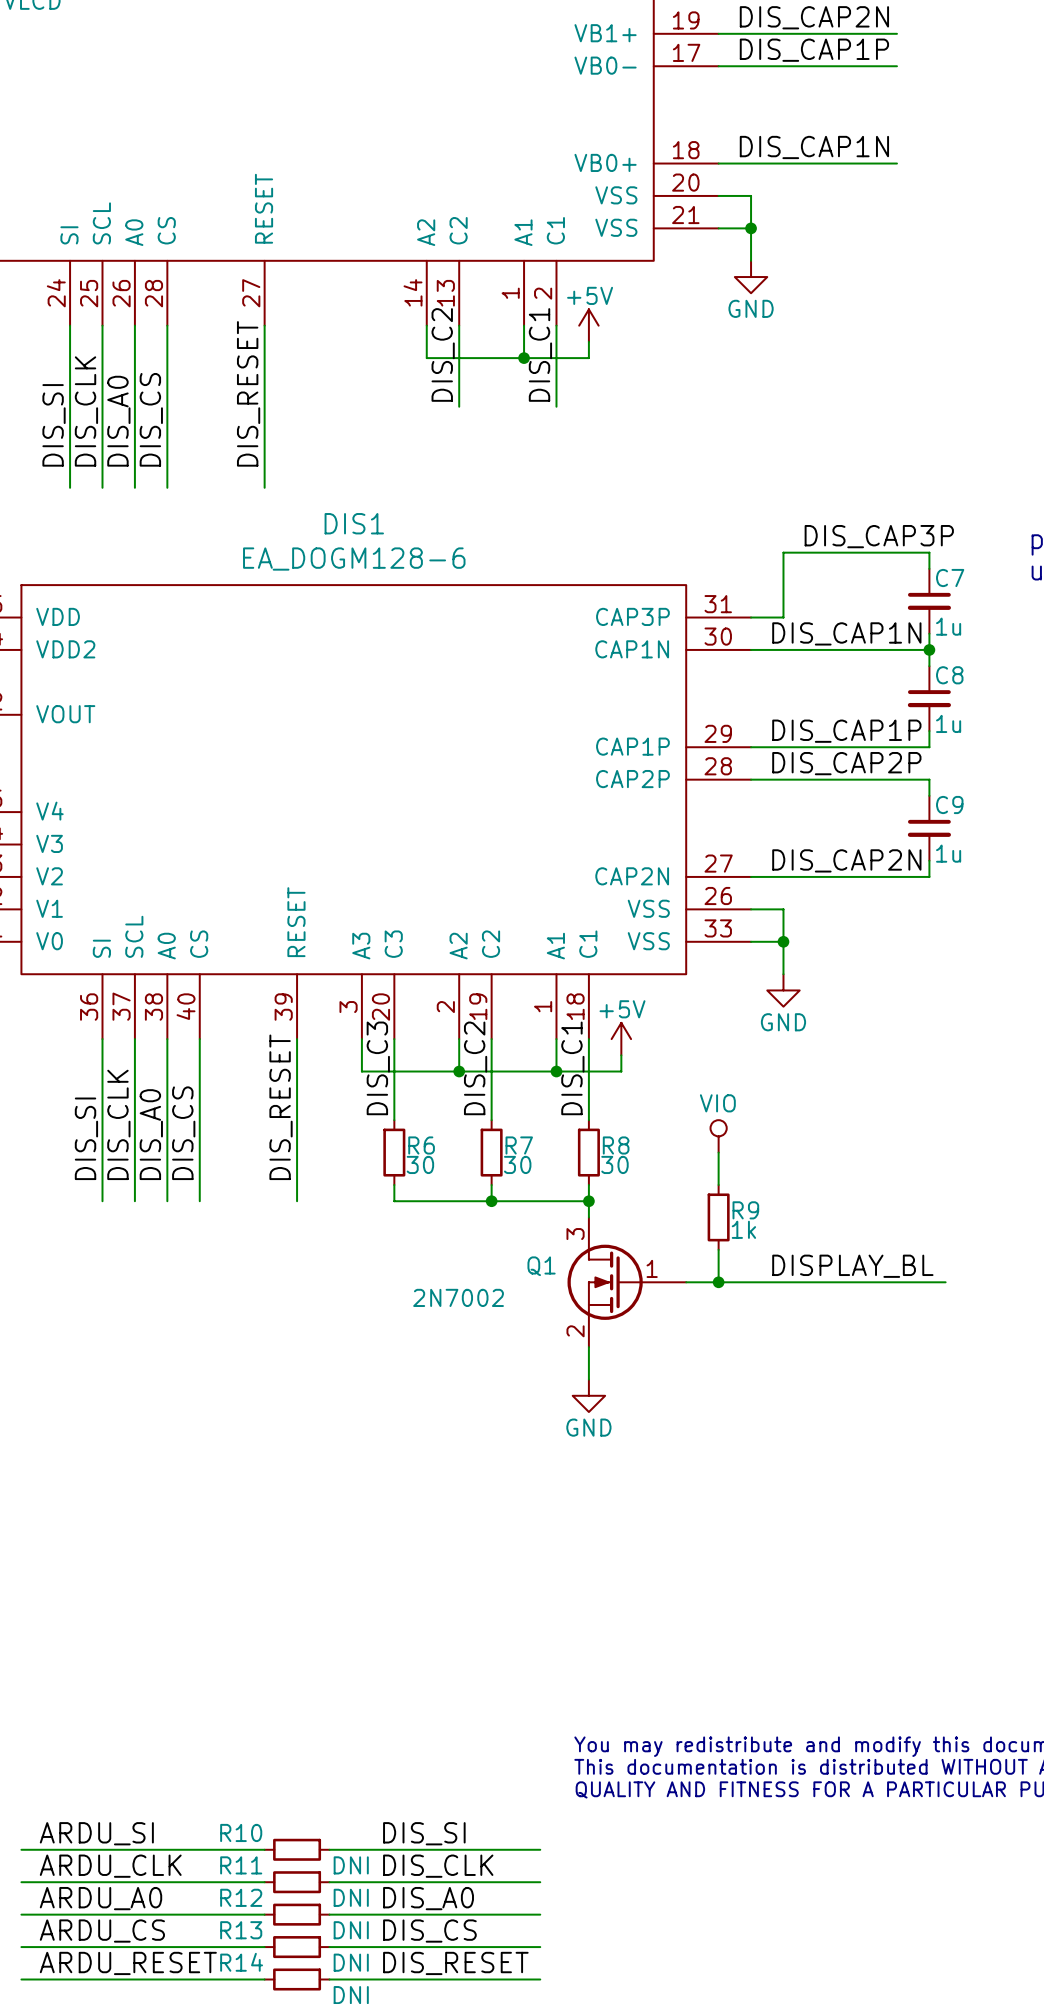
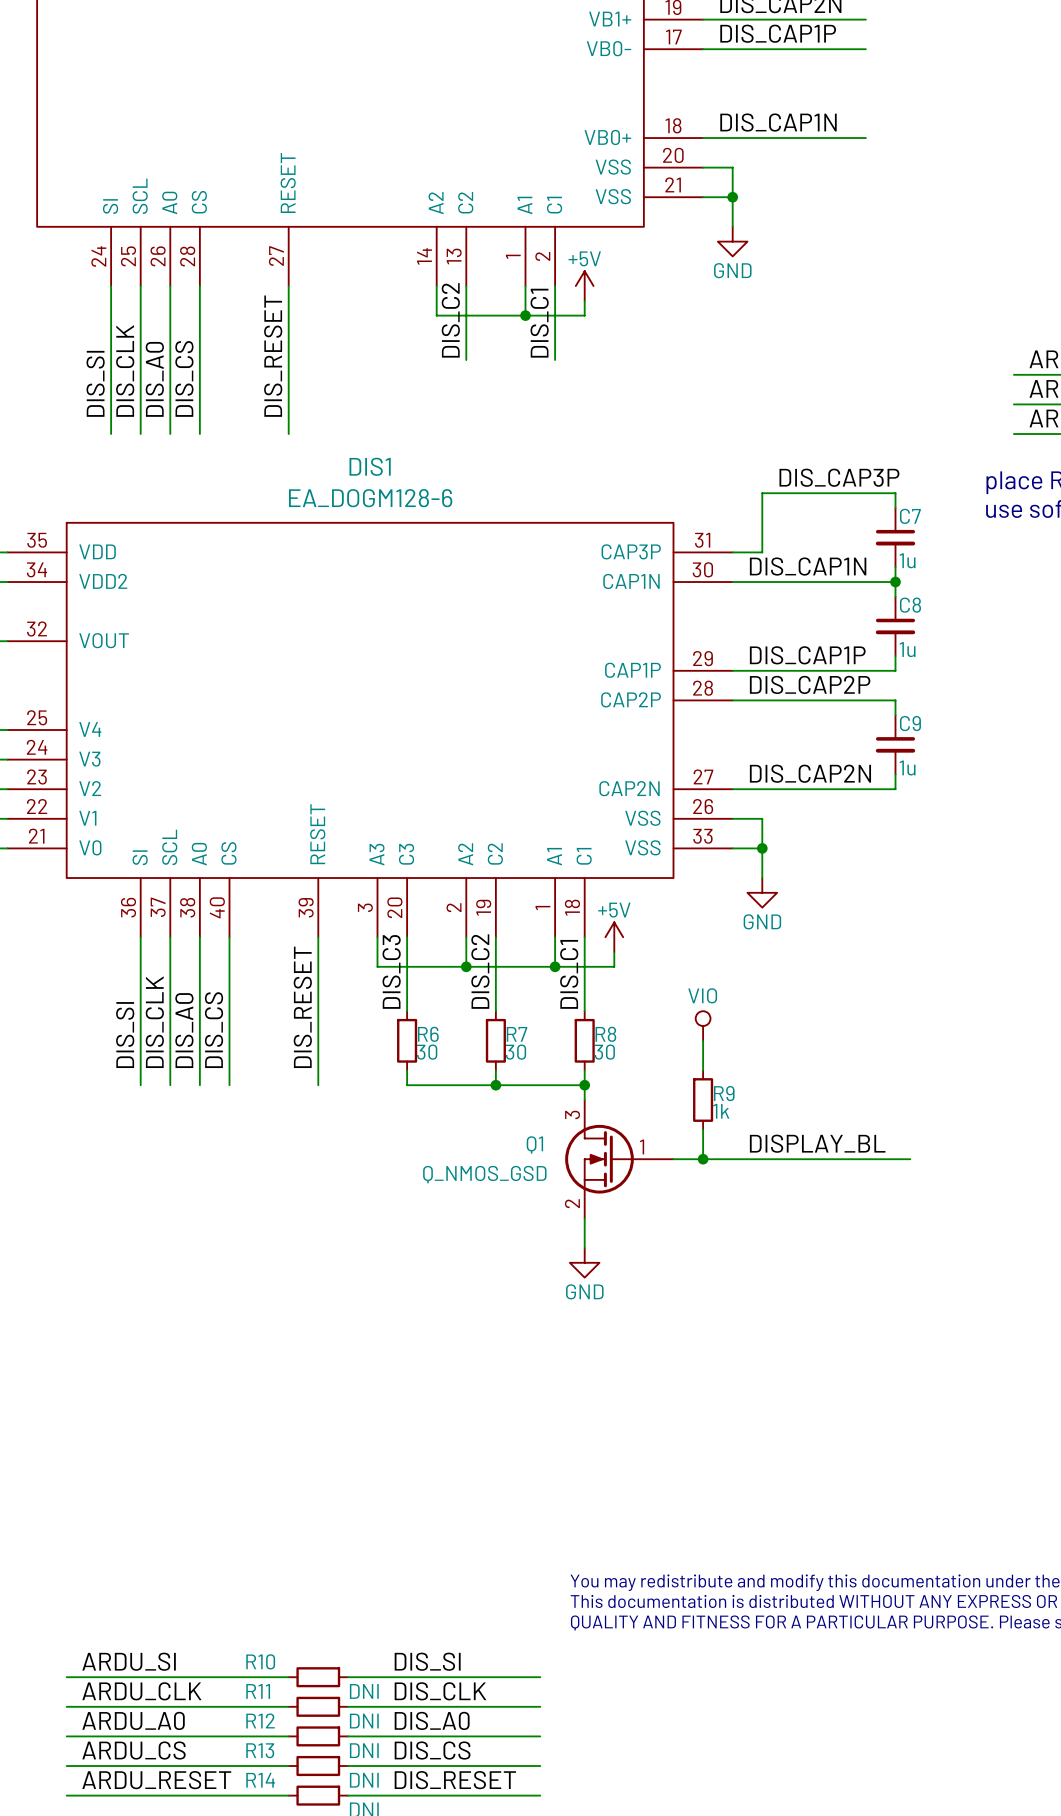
Q1 value: 2N7002 (458, 1297) -> Q_NMOS_GSD (484, 1174)

